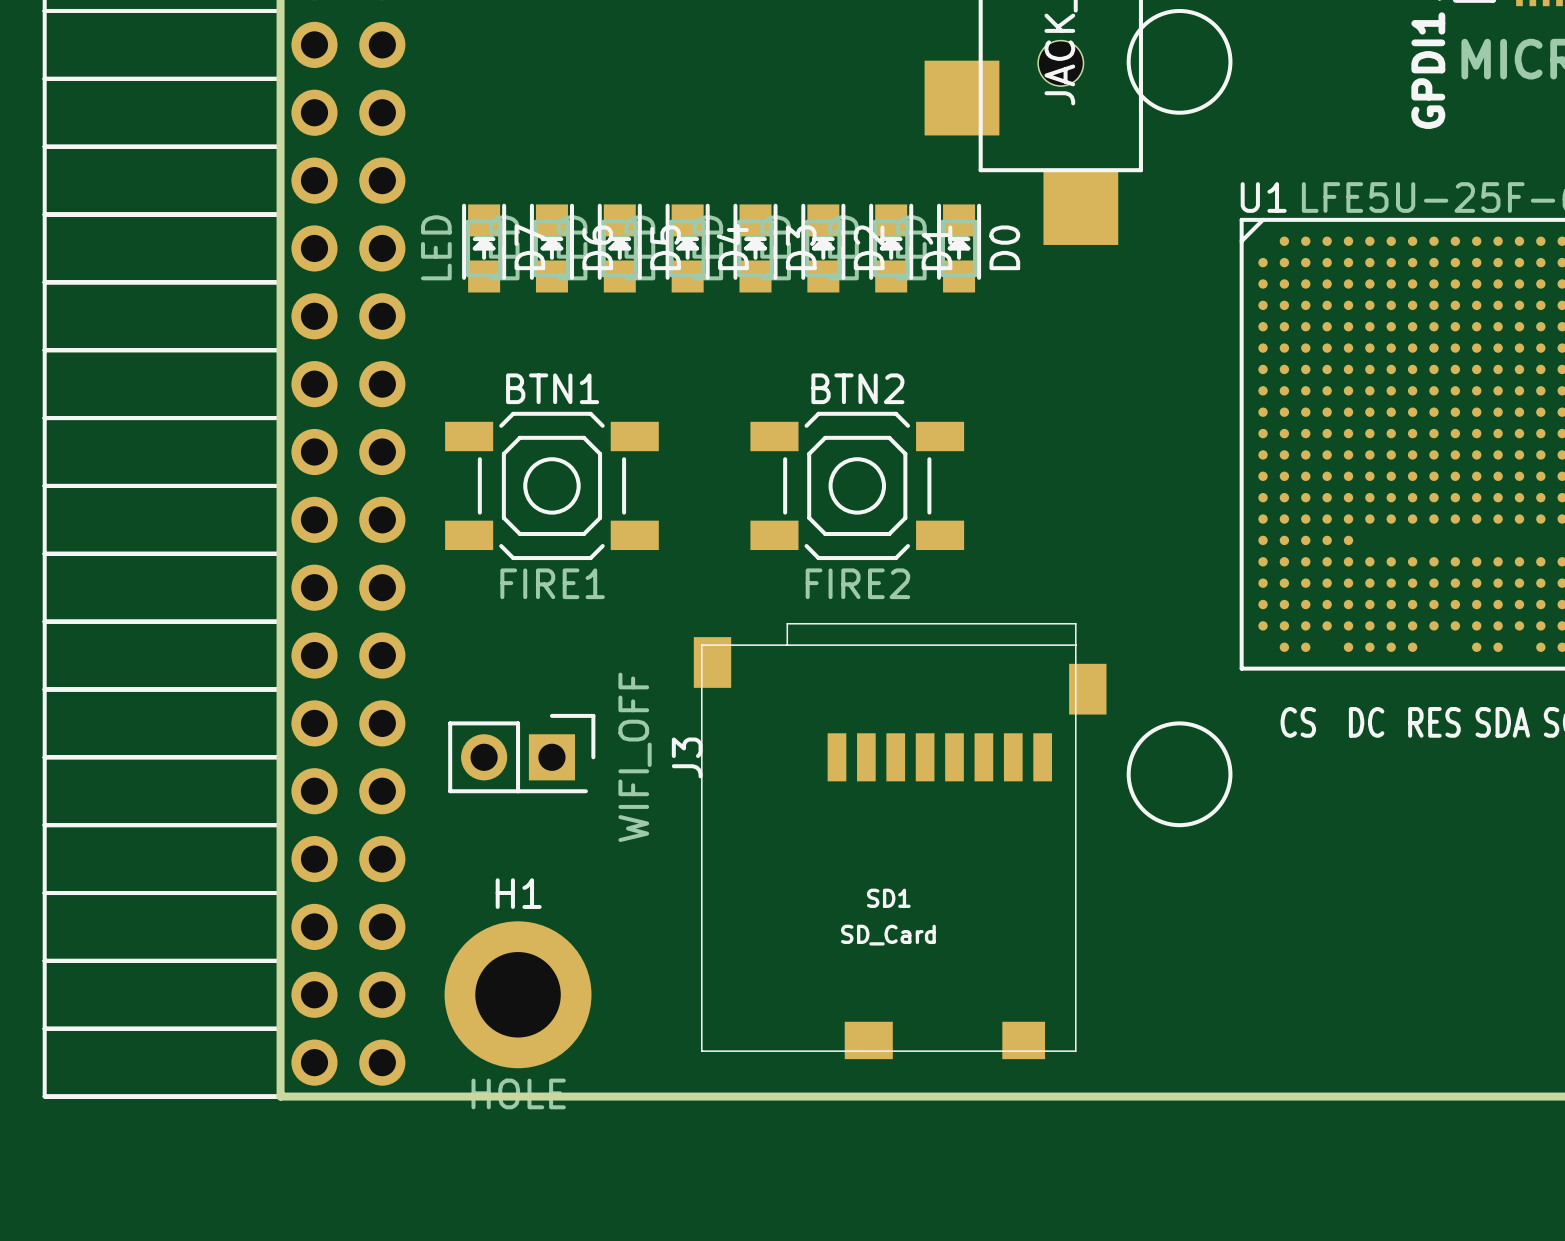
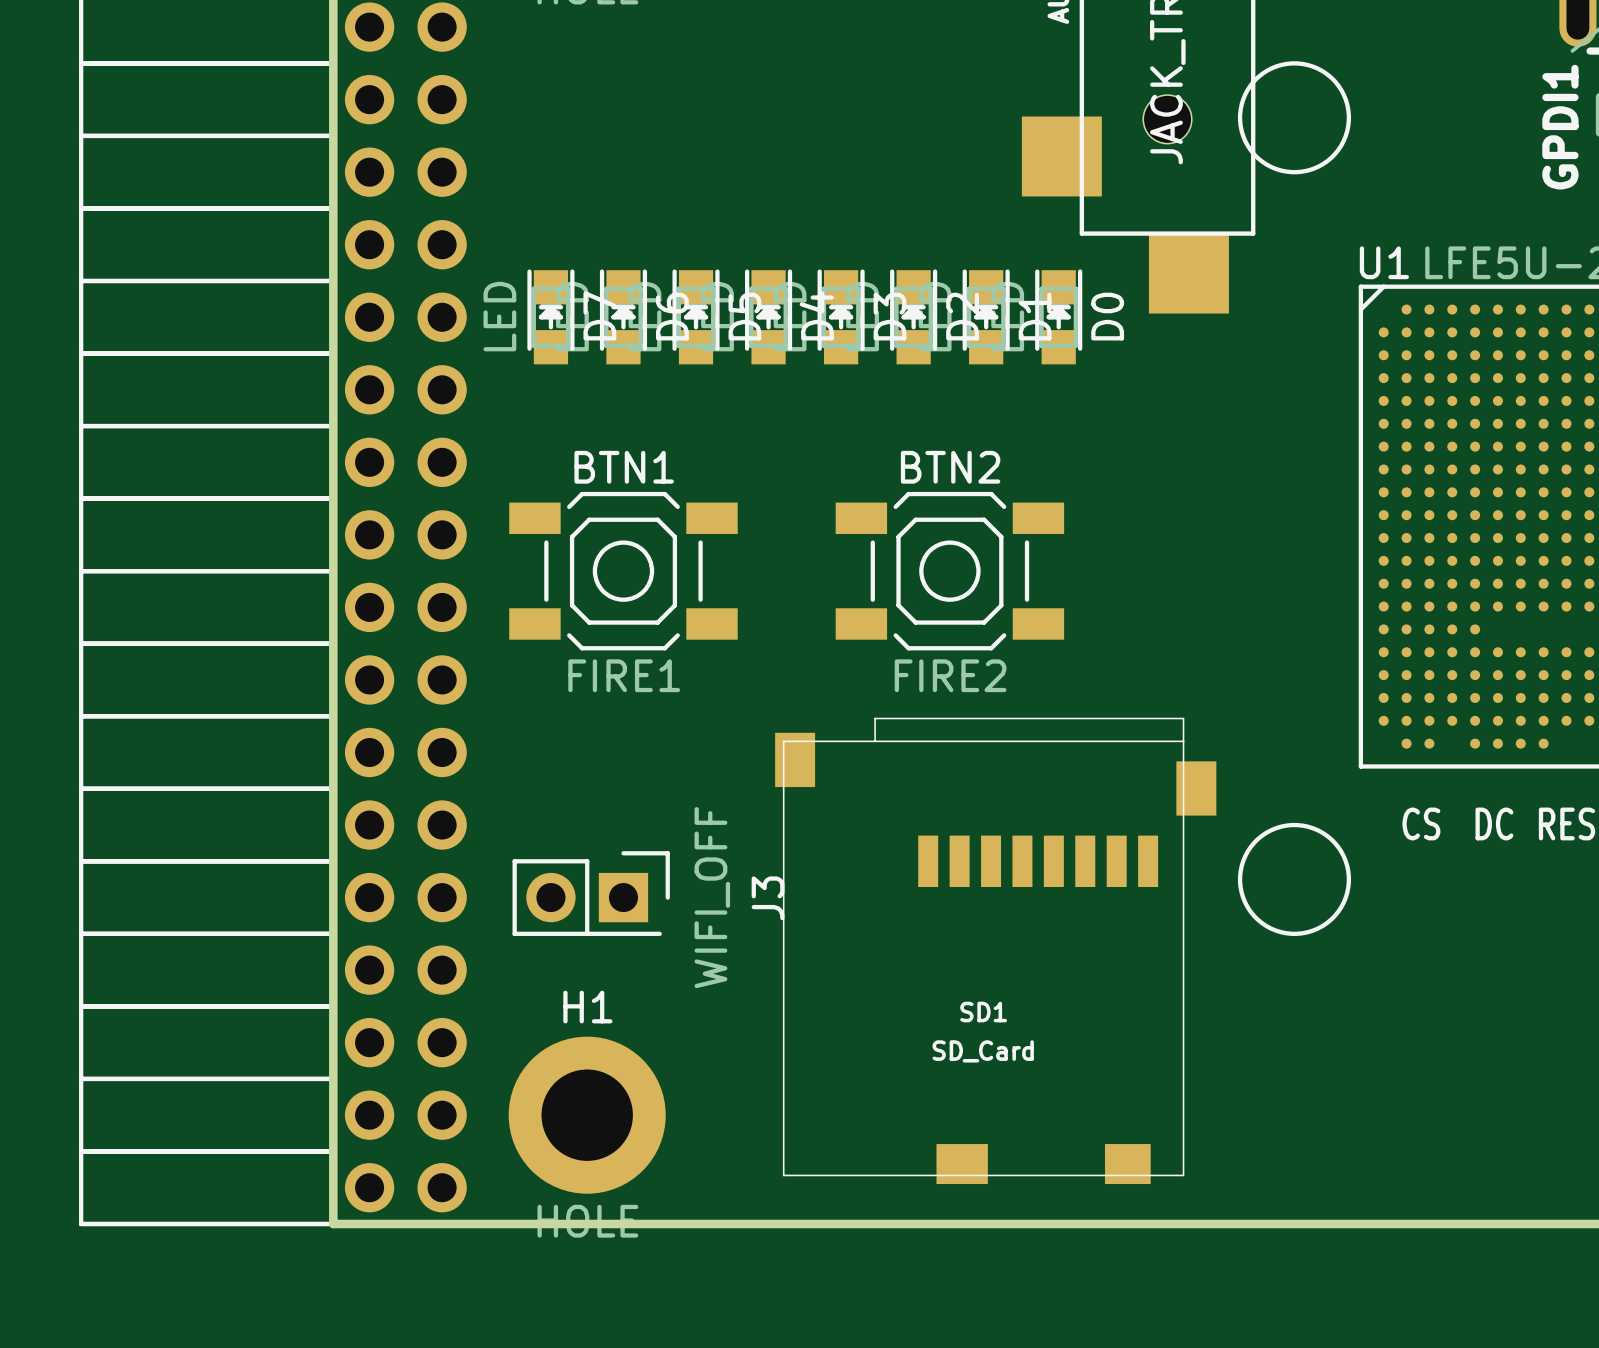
J3 position: (521, 753) -> (591, 893)

